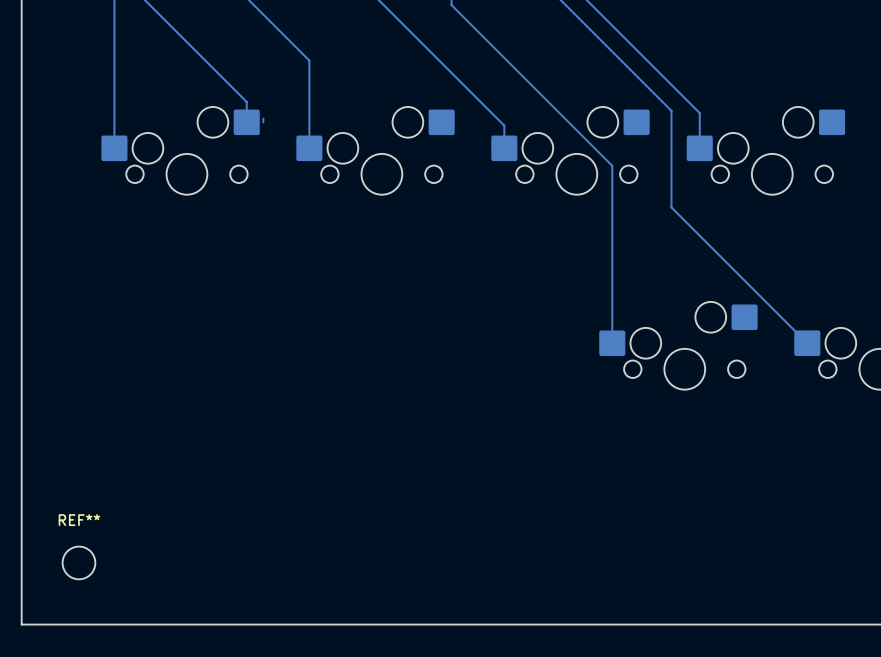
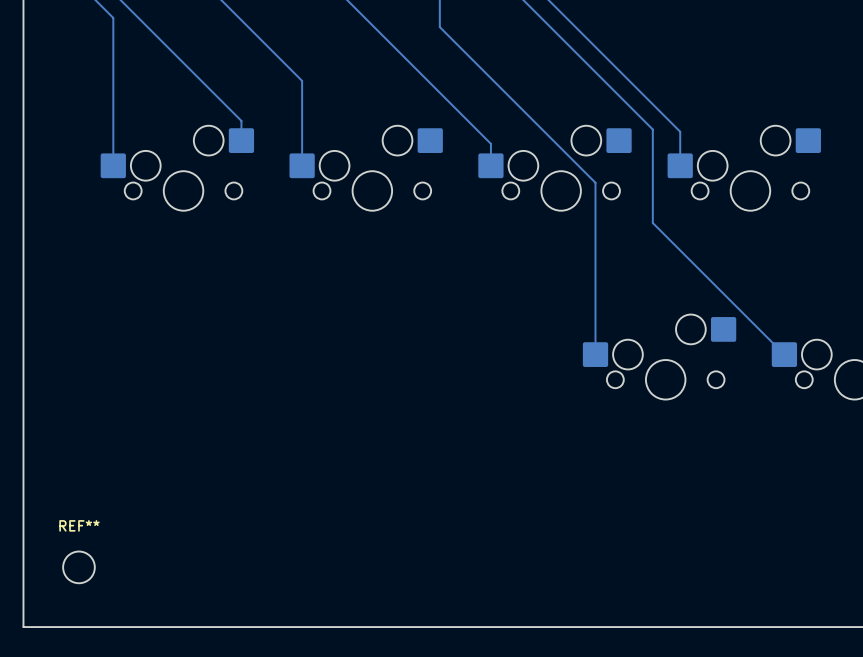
bottom track: (263, 118) (263, 122) -> none

